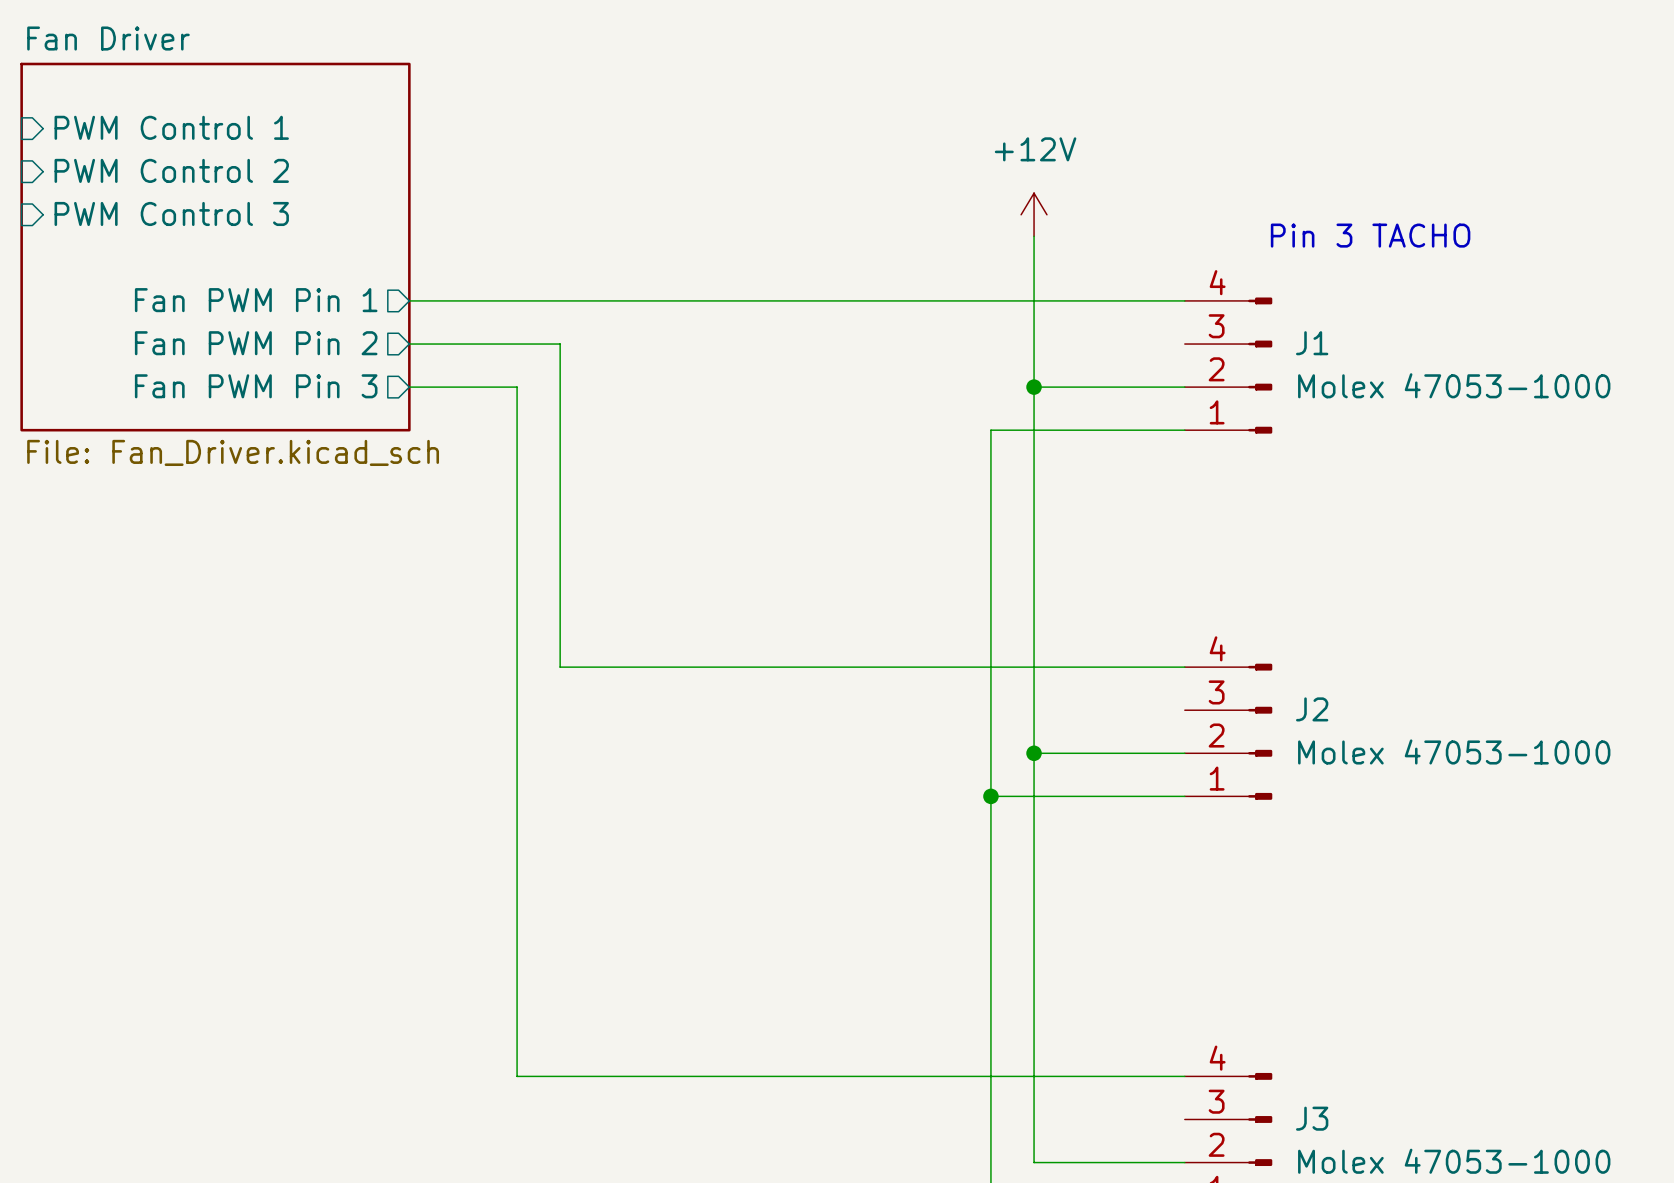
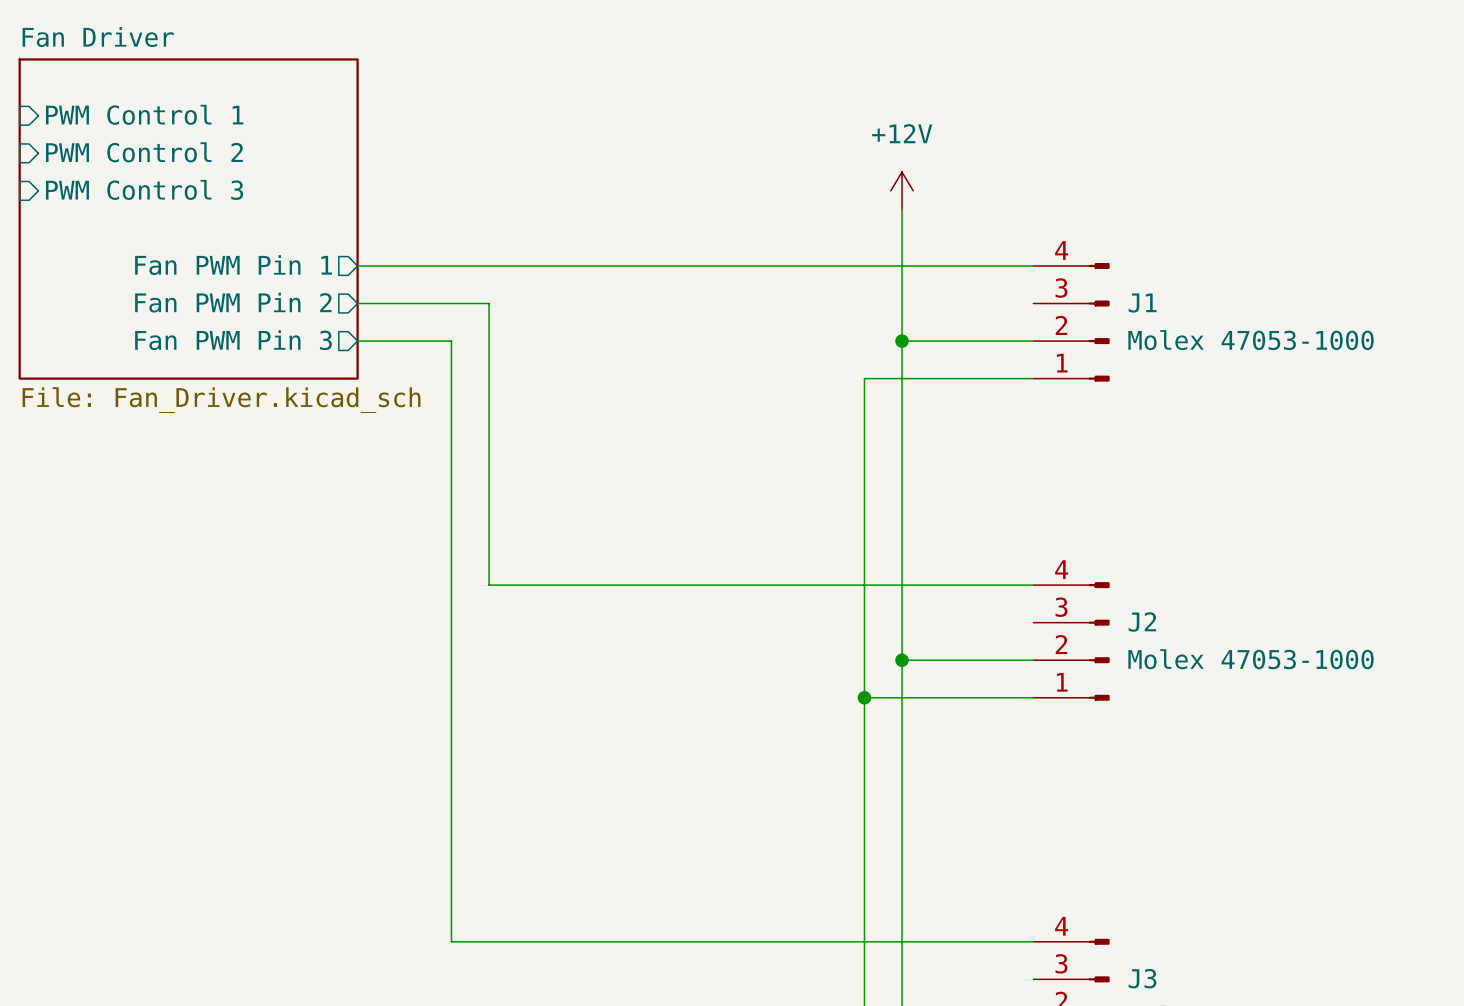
text: Pin 3 TACHO (1370, 235) -> none

